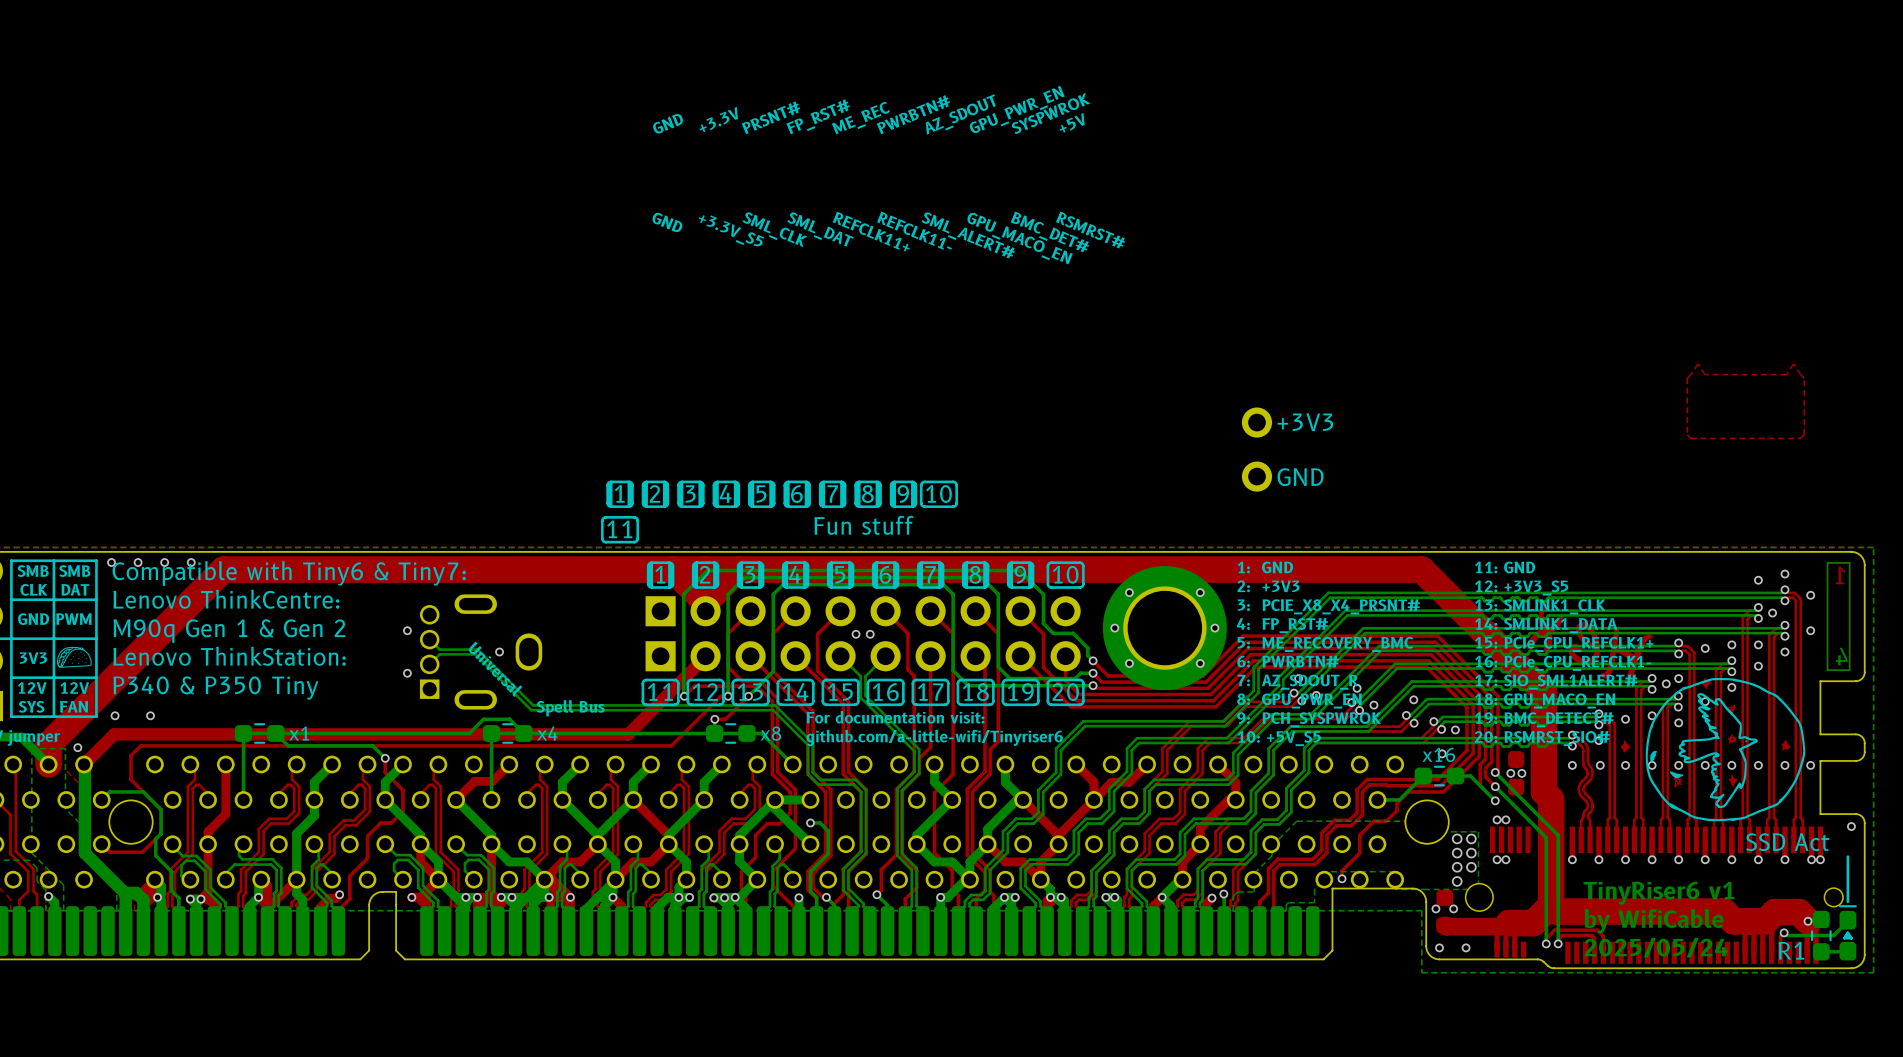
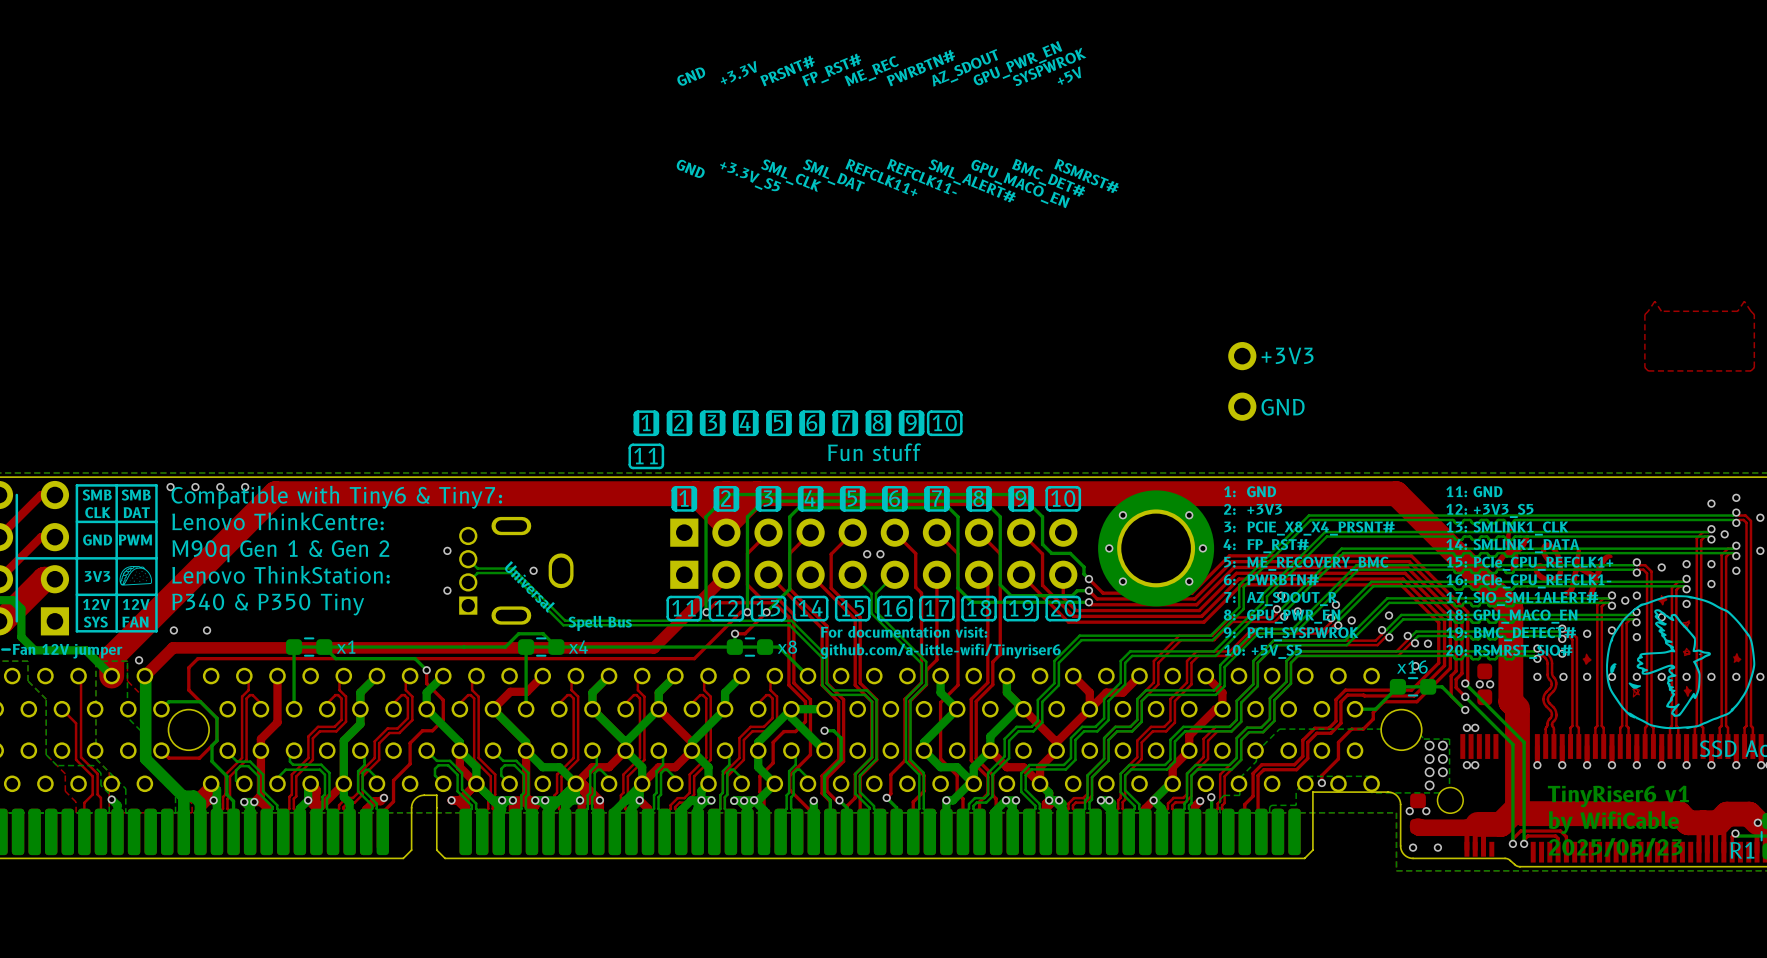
text: 2025/05/24 (1656, 947) -> 2025/05/23 (1615, 847)

